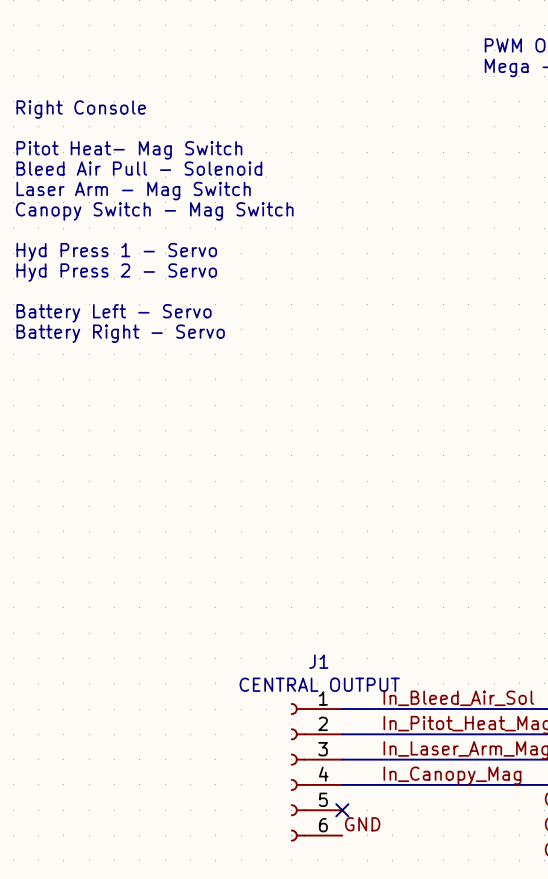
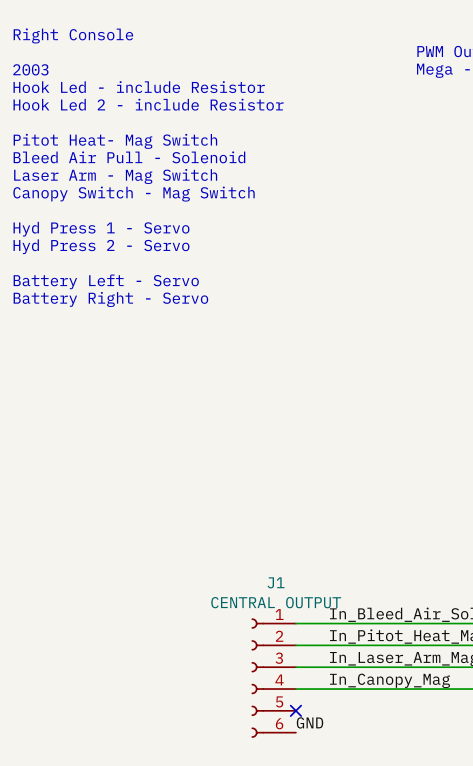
text: none -> Right Console (73, 35)
text: none -> 2003 (30, 69)
text: none -> Hook Led - include Resistor (139, 87)
text: Right Console (81, 109) -> Hook Led 2 - include Resistor (148, 104)

